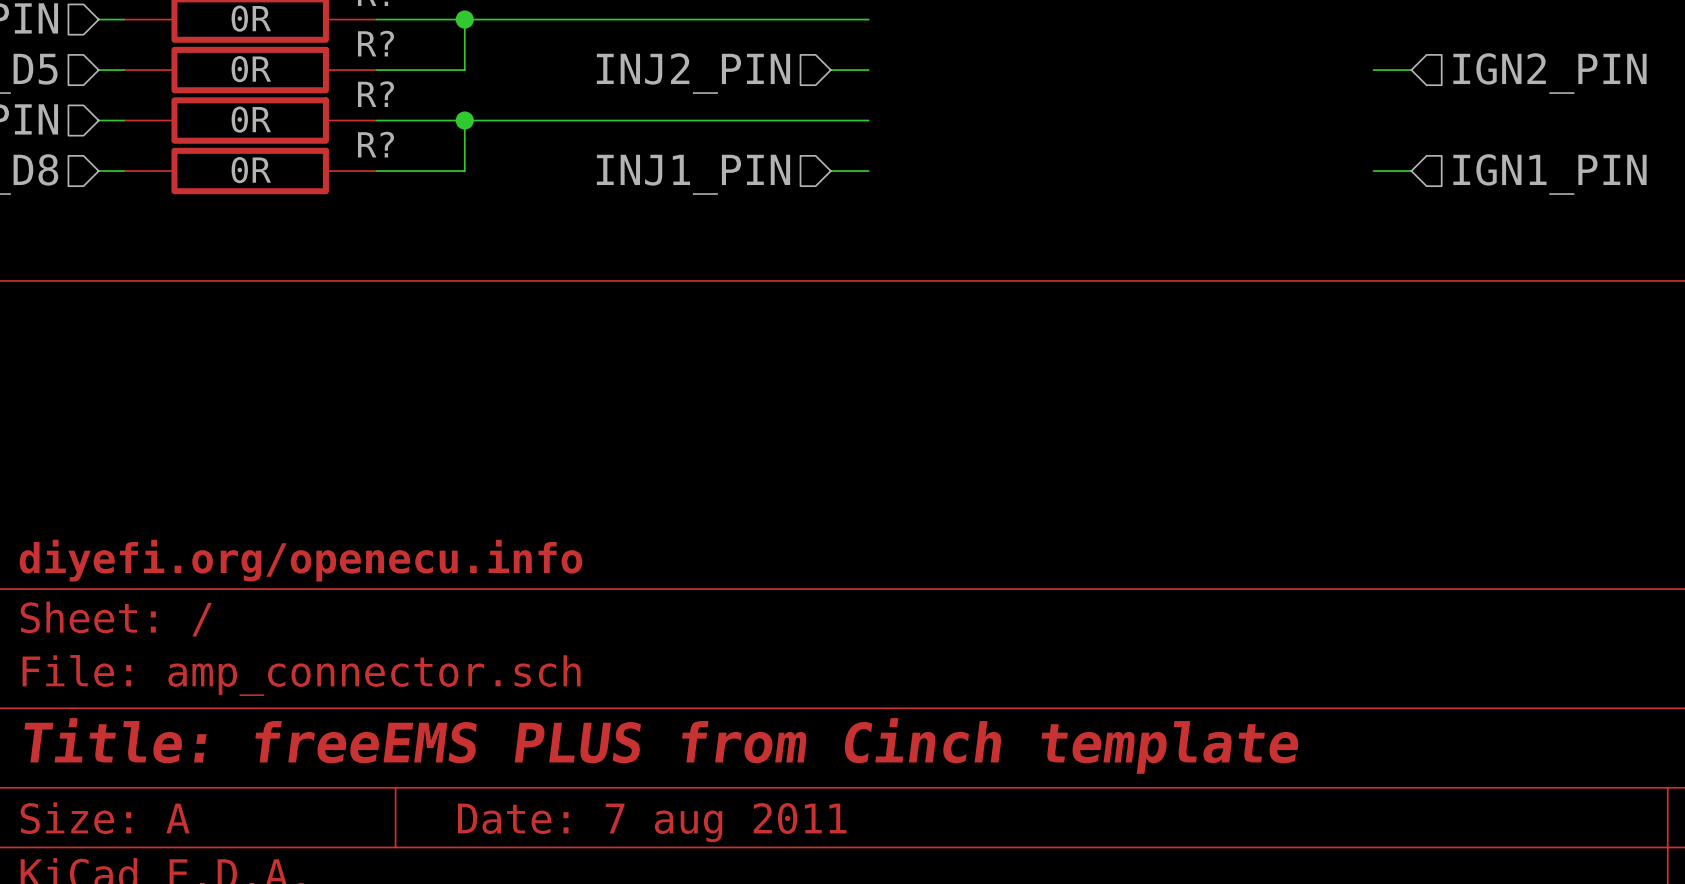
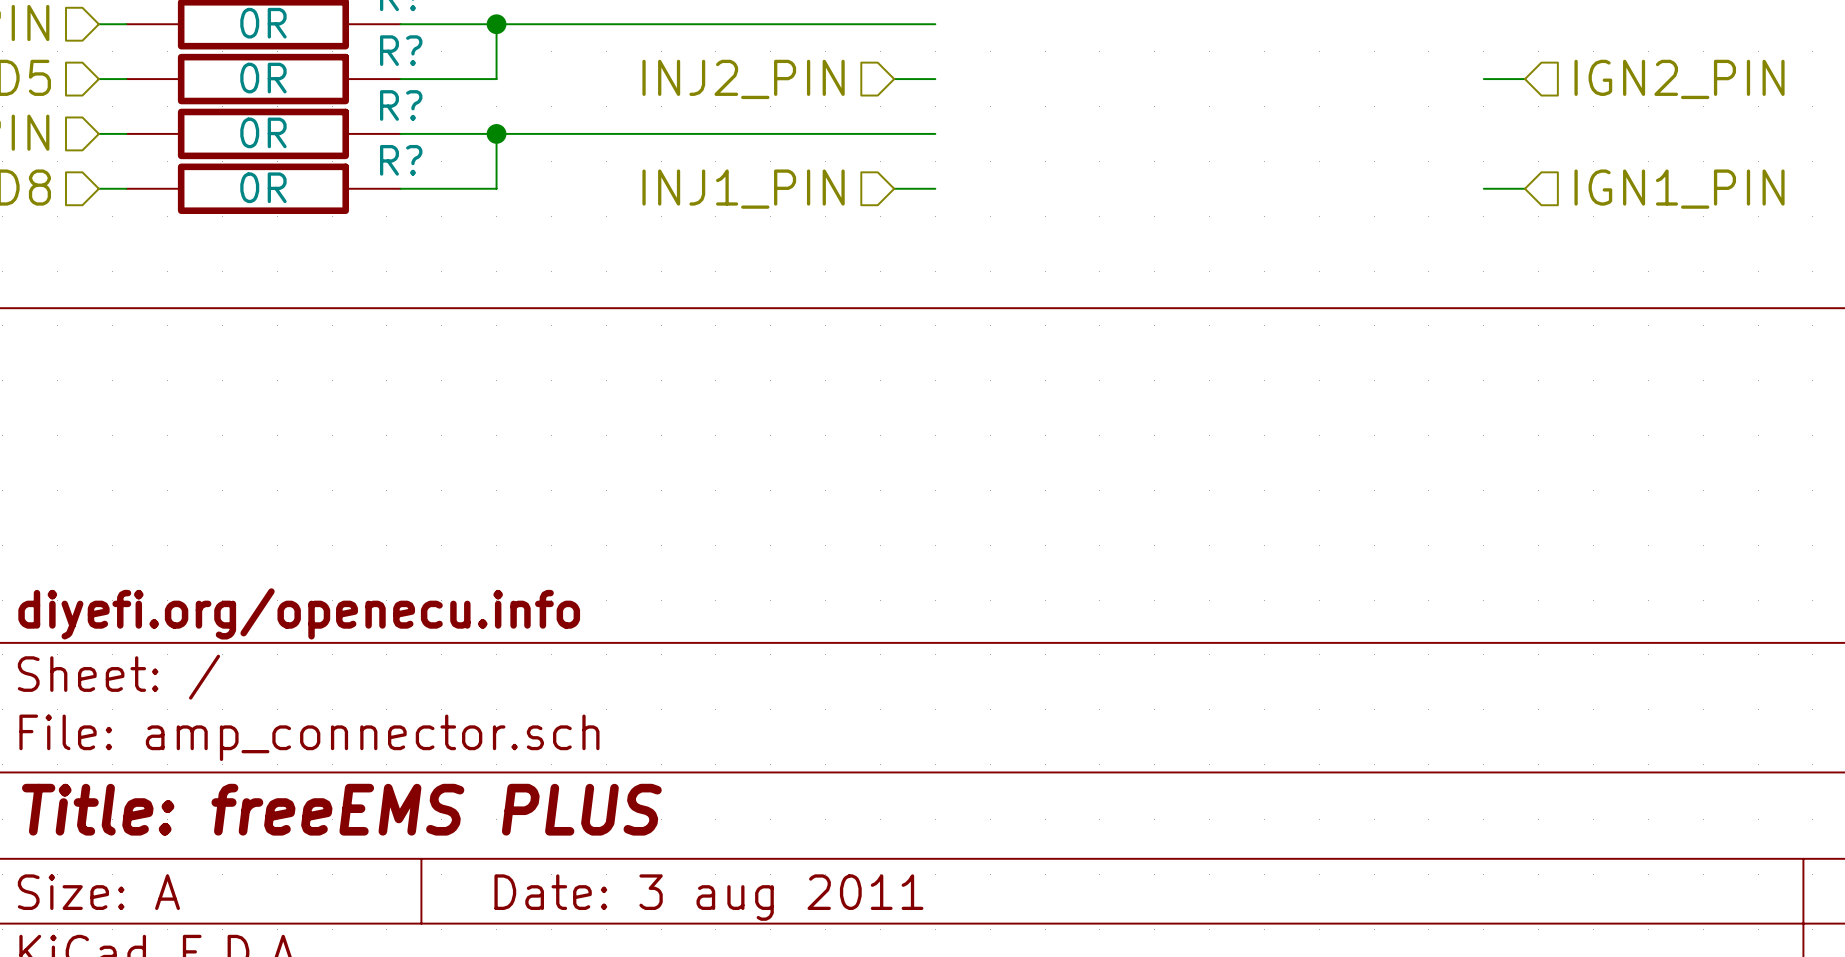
title block: Title: freeEMS PLUS from Cinch template (661, 745) -> Title: freeEMS PLUS (341, 809)
title block: Date: 7 aug 2011 (652, 822) -> Date: 3 aug 2011 (708, 897)

